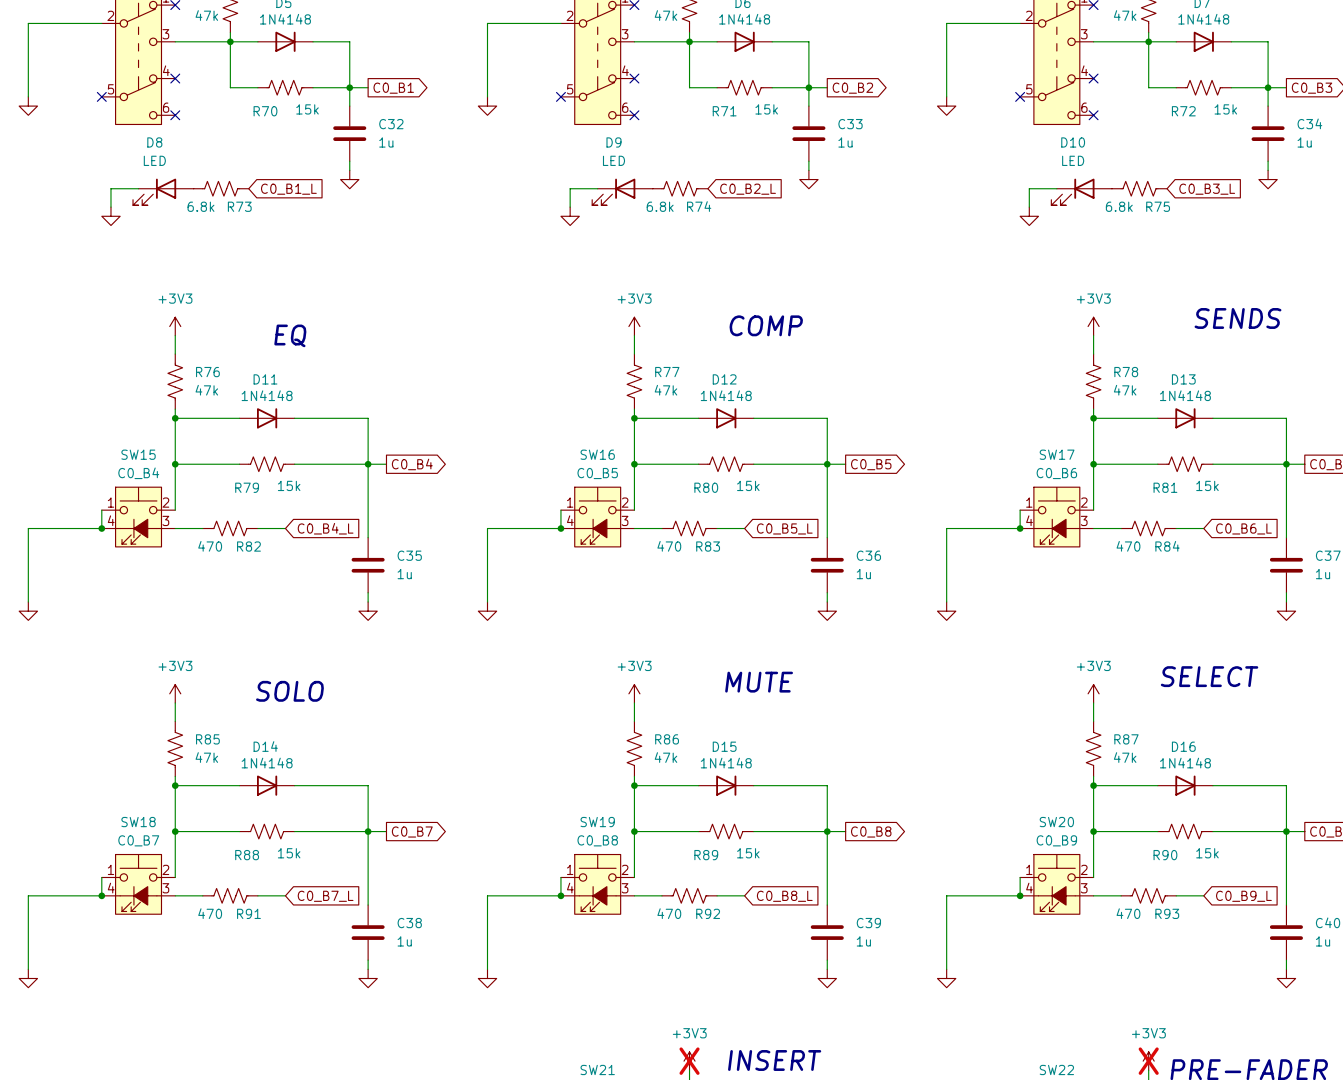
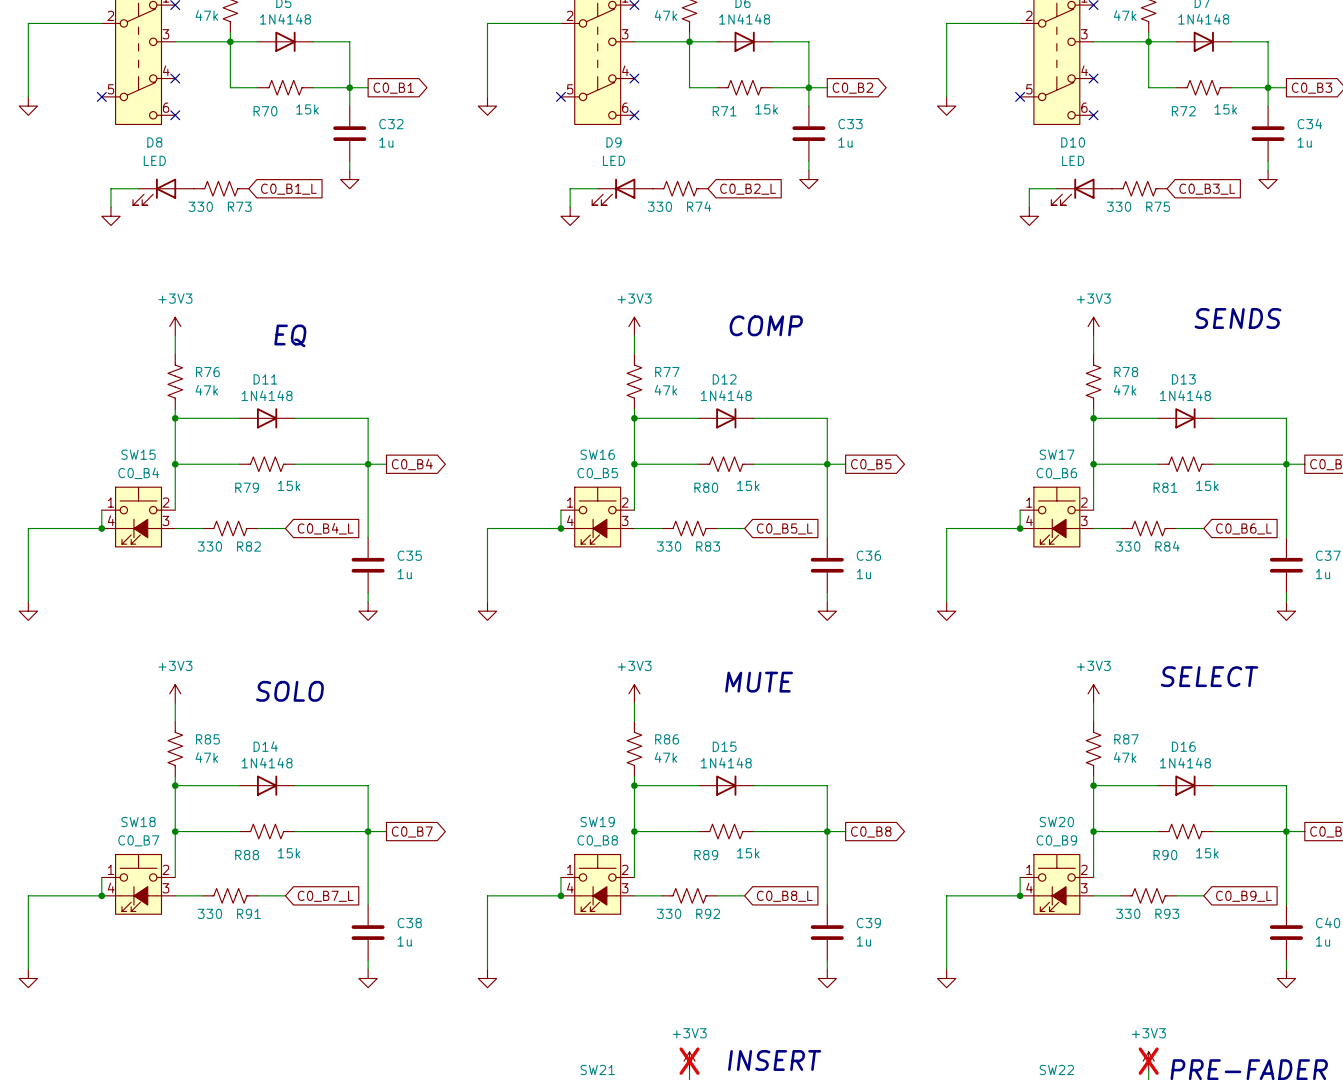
R73 value: 6.8k (200, 206) -> 330 (200, 206)
R74 value: 6.8k (660, 206) -> 330 (659, 206)
R75 value: 6.8k (1119, 206) -> 330 (1119, 206)
R82 value: 470 (210, 546) -> 330 (209, 546)
R83 value: 470 (669, 546) -> 330 (669, 546)
R84 value: 470 (1128, 546) -> 330 (1128, 546)
R91 value: 470 (210, 913) -> 330 (209, 913)
R92 value: 470 (669, 913) -> 330 (669, 913)
R93 value: 470 (1128, 913) -> 330 (1128, 913)

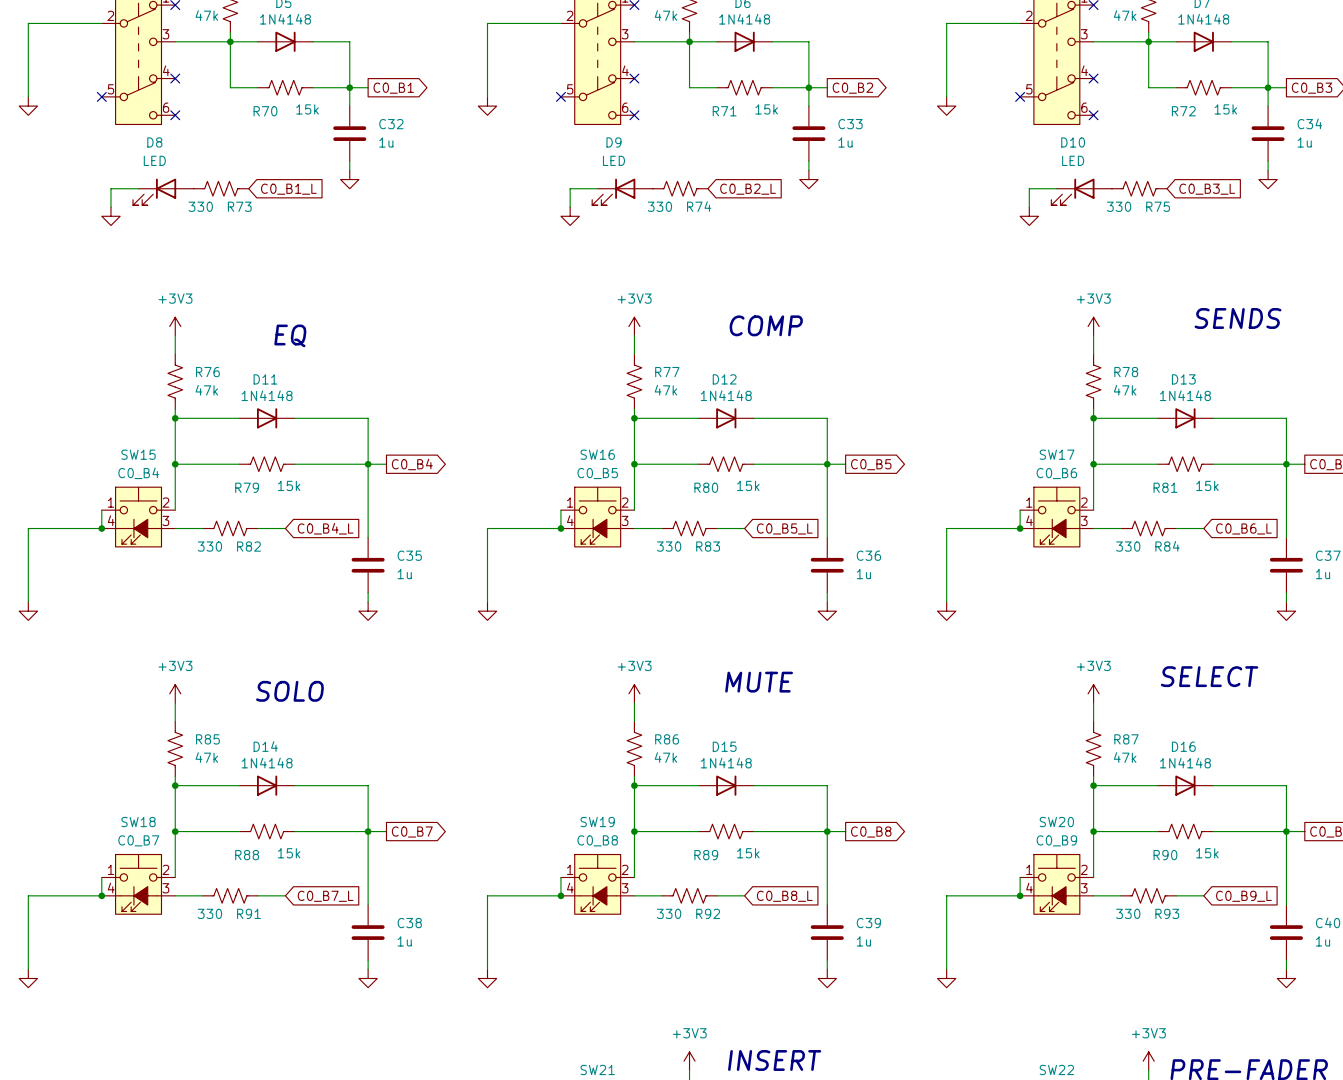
power symbol do-not-place cross: (689, 1061) -> none
power symbol do-not-place cross: (1148, 1061) -> none

